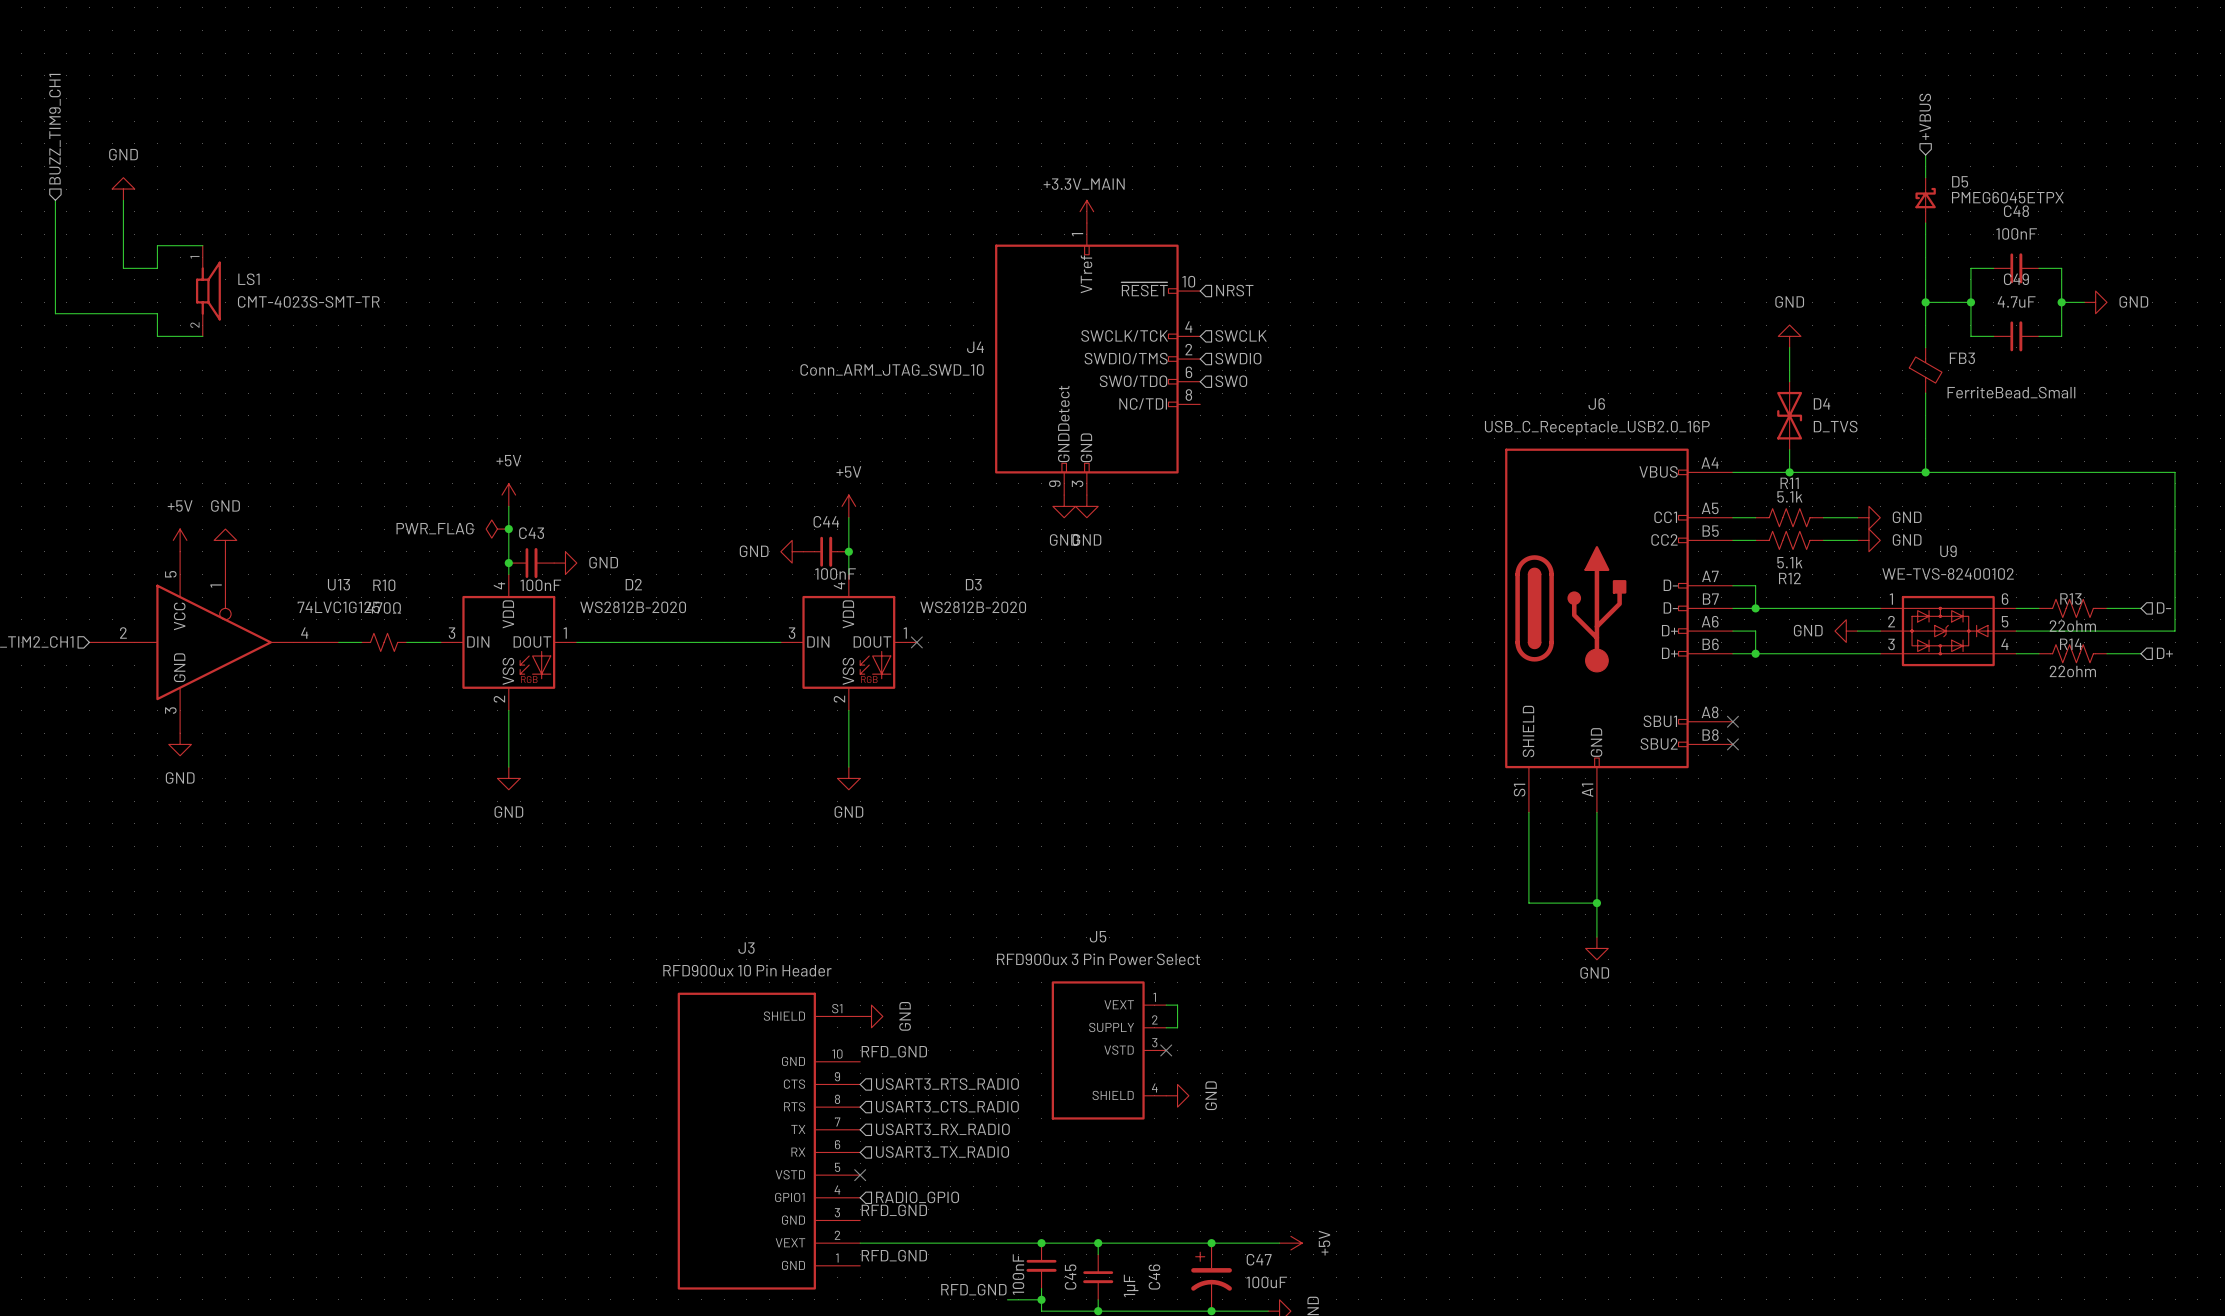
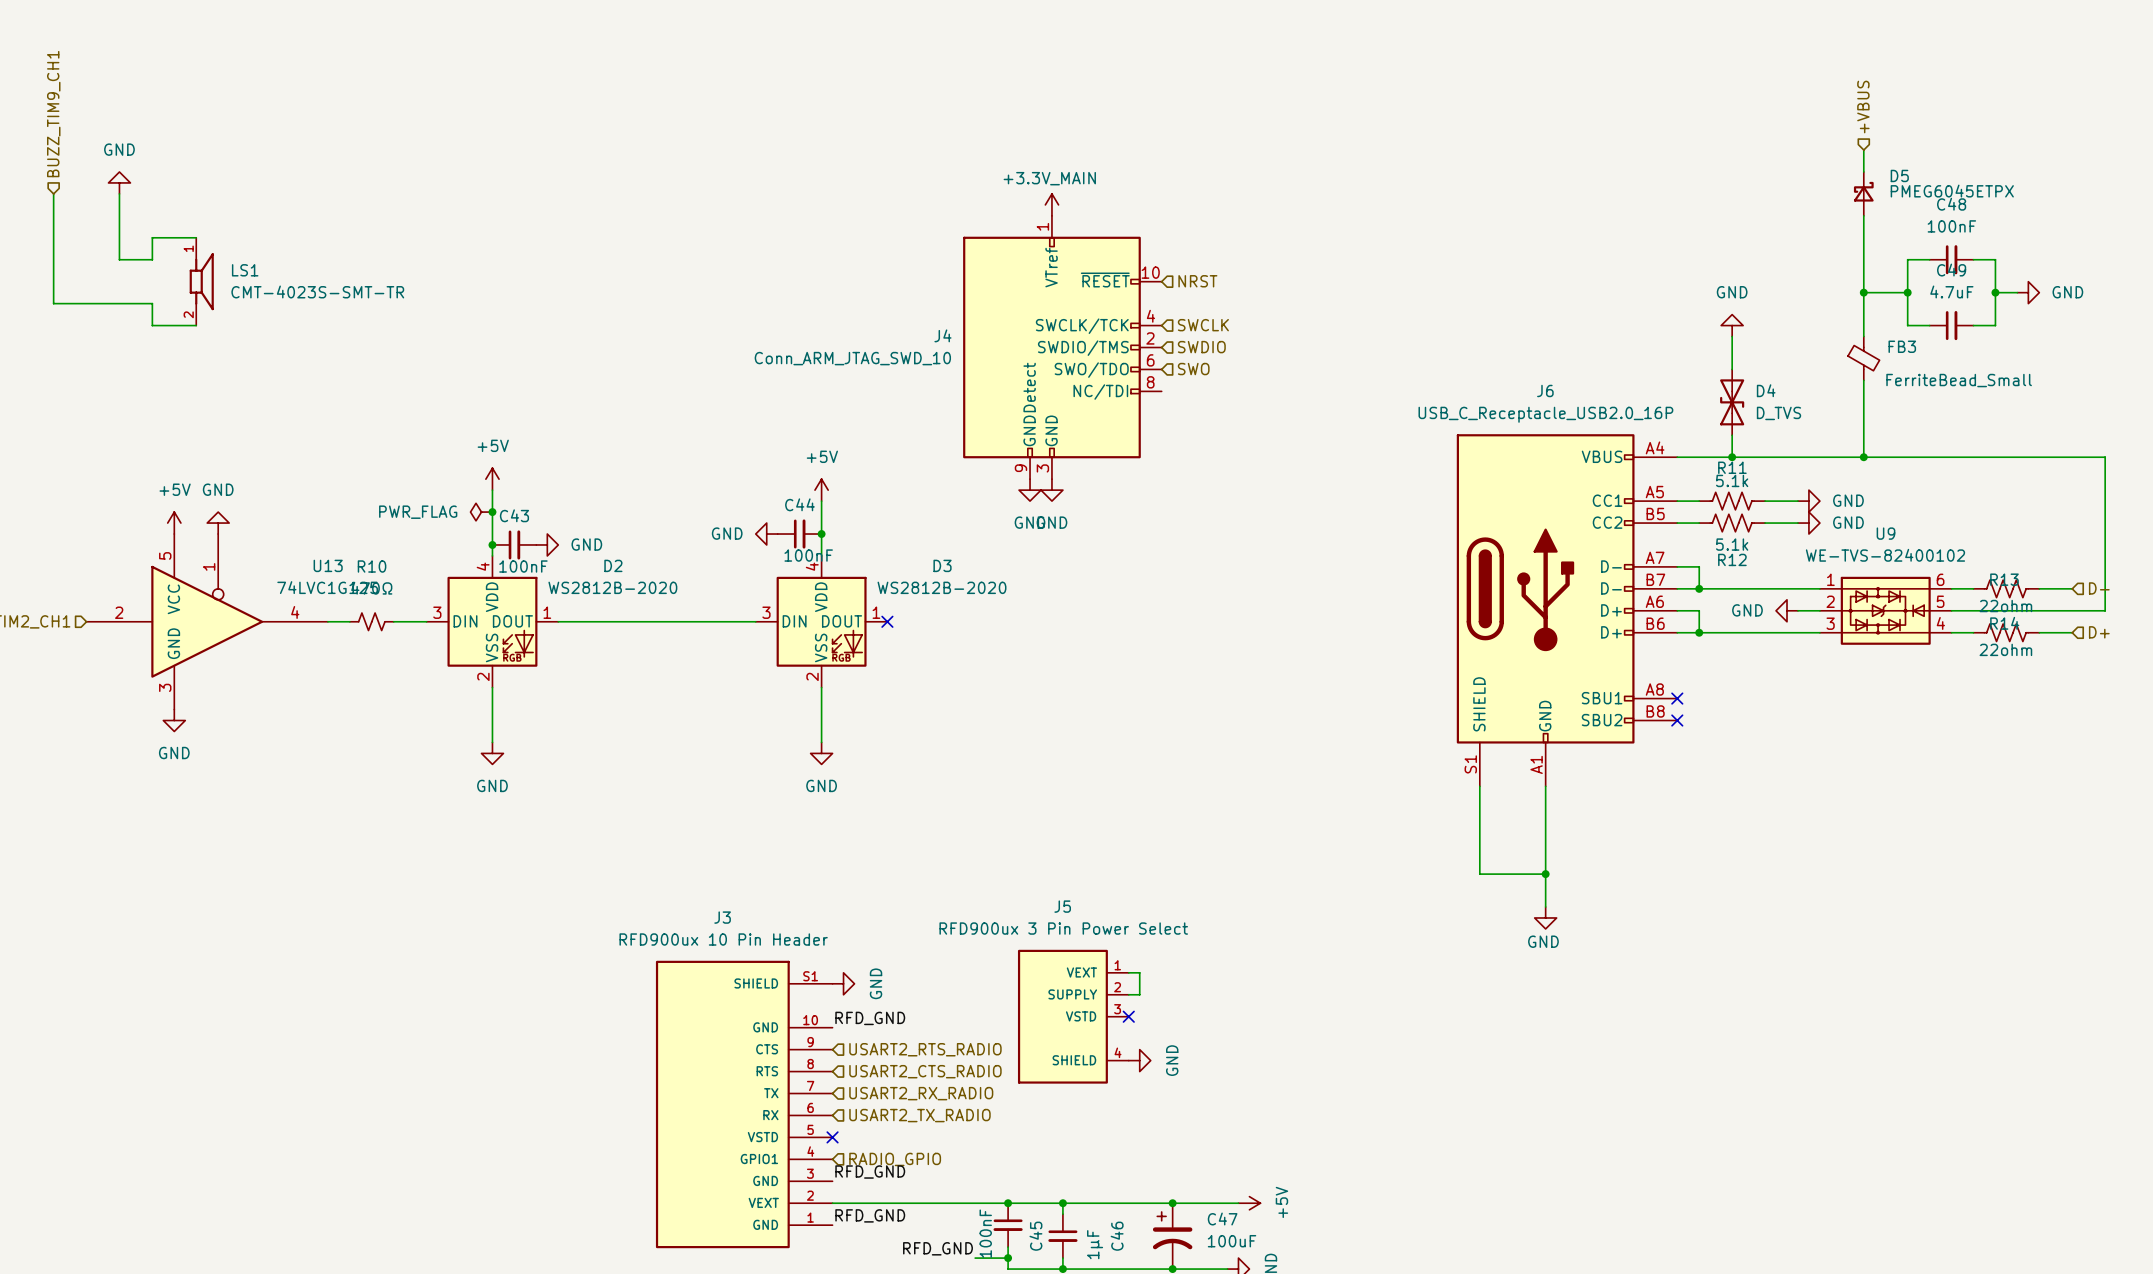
hierarchical label: USART3_RTS_RADIO (947, 1084) -> USART2_RTS_RADIO (925, 1049)
hierarchical label: USART3_CTS_RADIO (947, 1106) -> USART2_CTS_RADIO (925, 1071)
hierarchical label: USART3_RX_RADIO (942, 1129) -> USART2_RX_RADIO (921, 1093)
hierarchical label: USART3_TX_RADIO (942, 1152) -> USART2_TX_RADIO (919, 1115)

